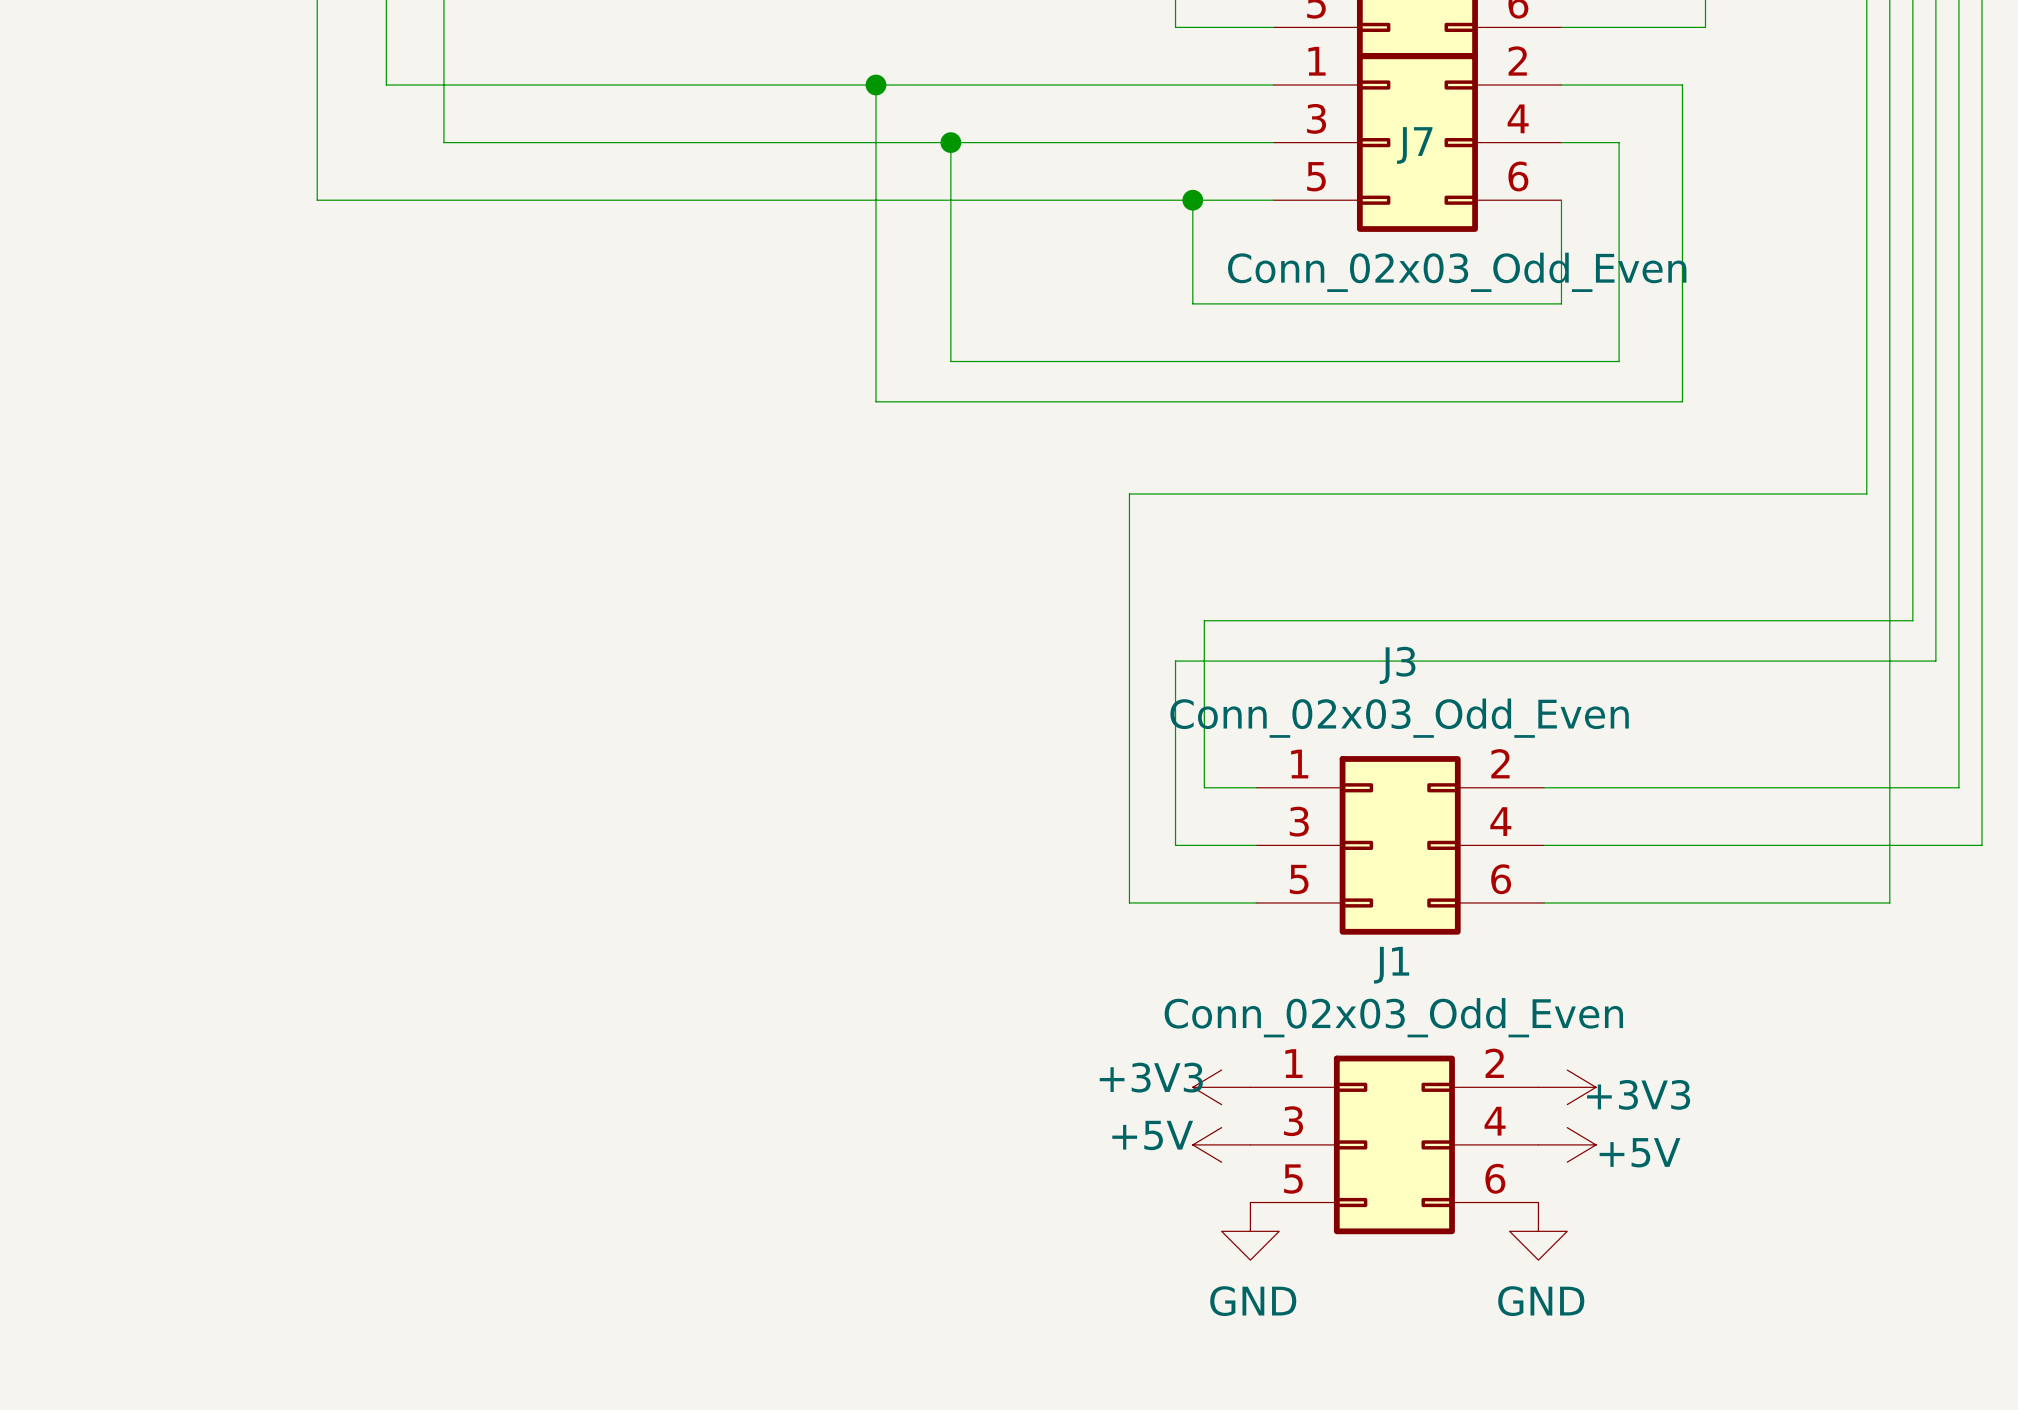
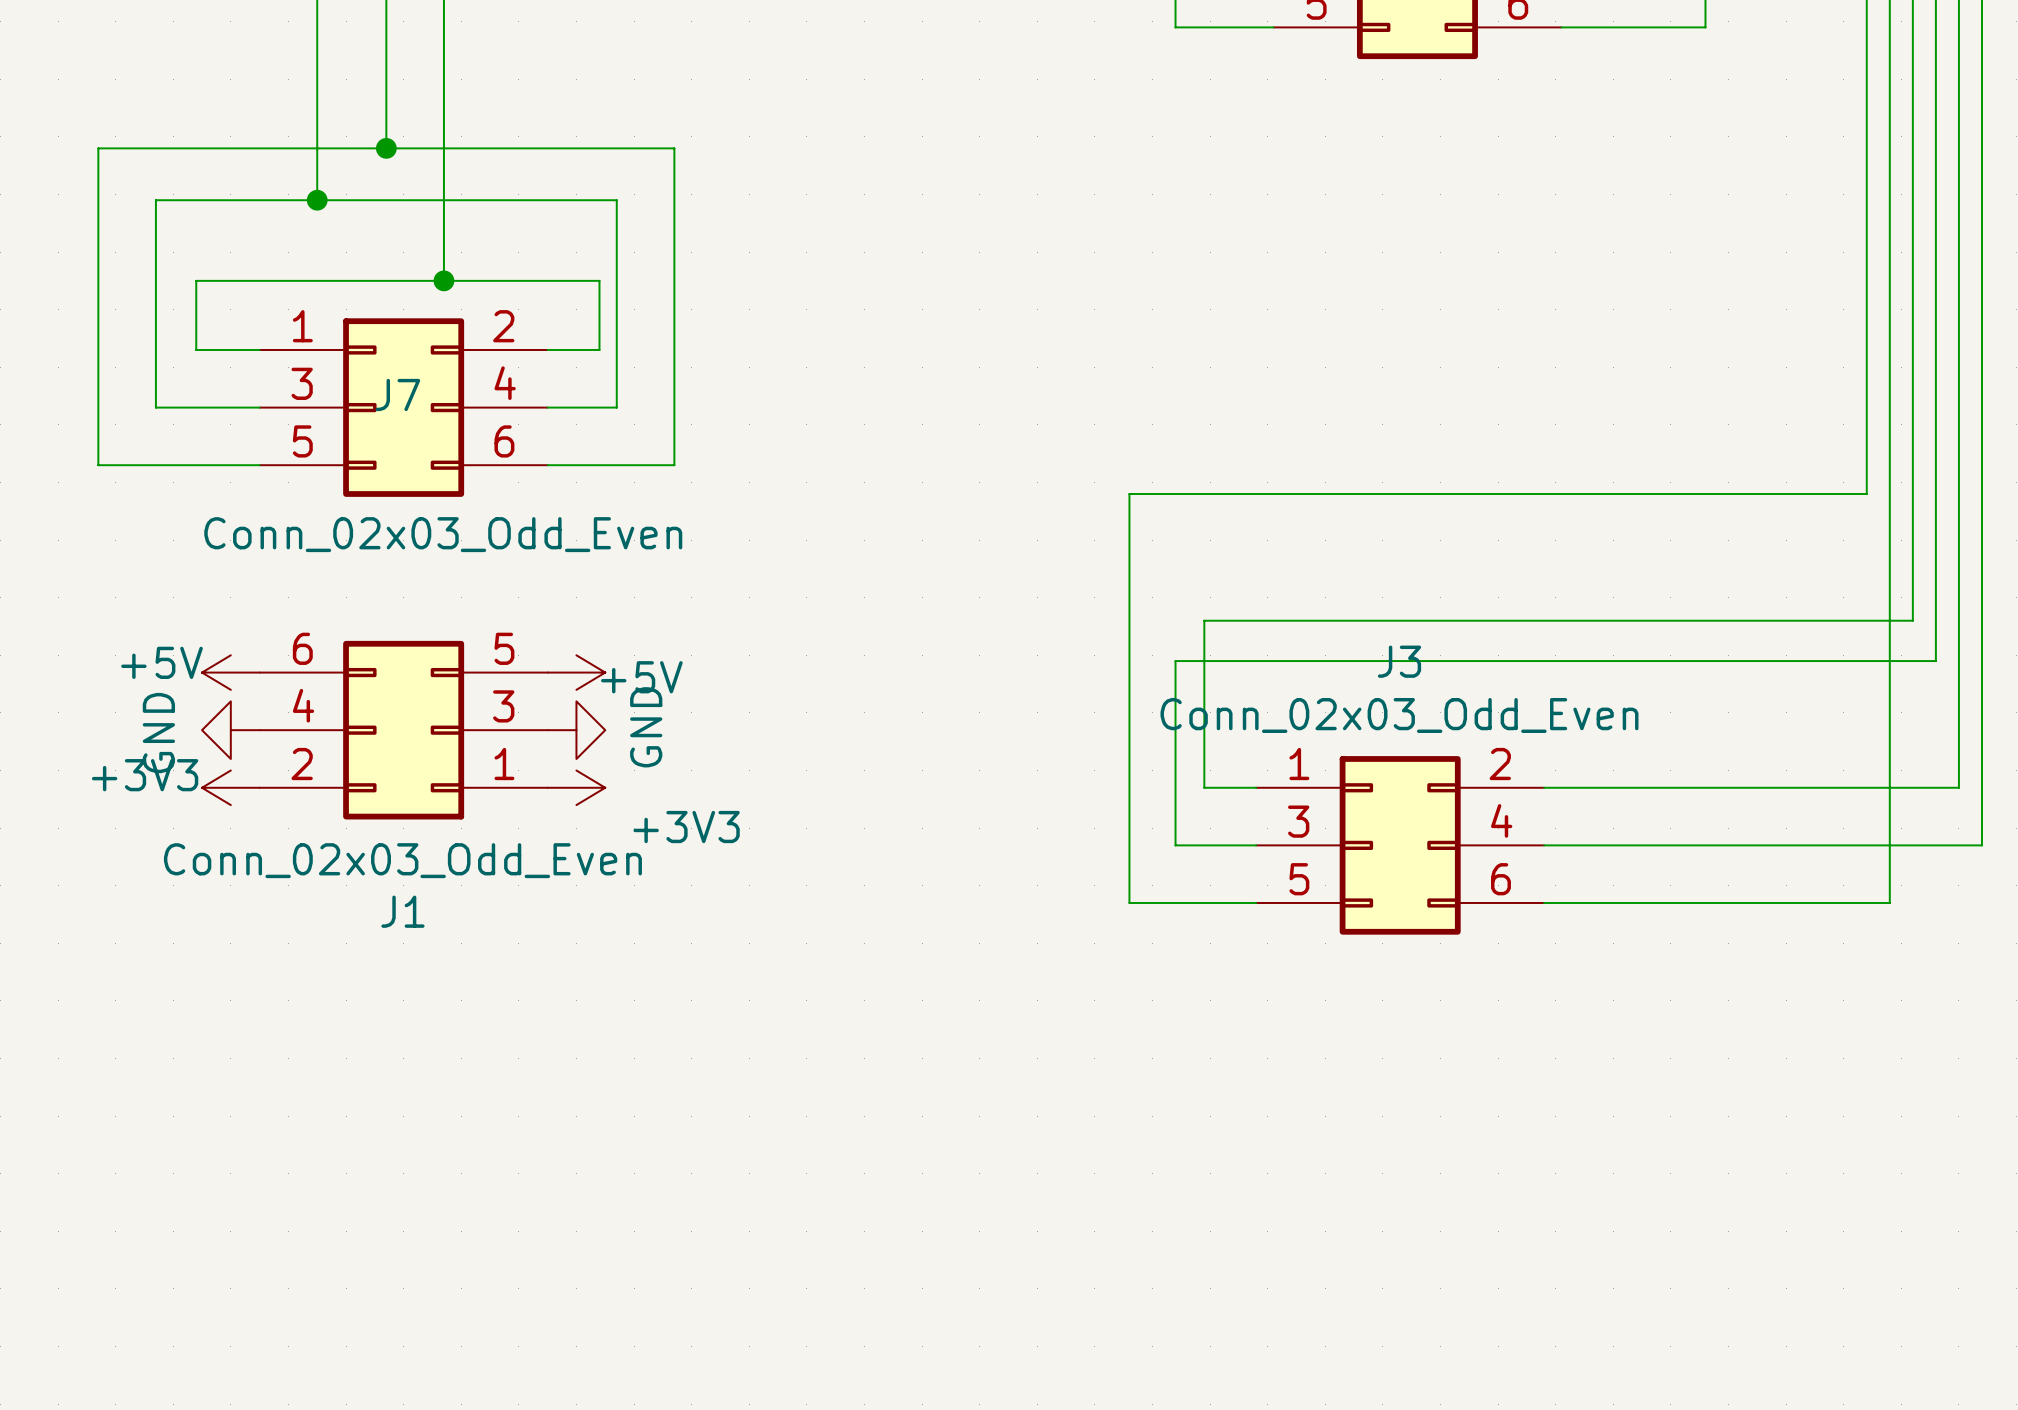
wire: (386, 85) (1273, 85) -> (386, 85) (386, 148)
wire: (875, 85) (875, 401) (1682, 401) (1682, 85) (1561, 85) -> none
junction: (875, 85) -> none
wire: (443, 142) (1273, 142) -> (443, 142) (443, 280)
wire: (950, 142) (950, 361) (1619, 361) (1619, 142) (1561, 142) -> none
junction: (950, 142) -> none
J7 position: (1417, 142) -> (403, 407)
J7 name position: J7 (1414, 145) -> J7 (397, 394)
junction: none -> (386, 148)
wire: none -> (317, 200) (155, 200) (155, 407) (259, 407)
junction: none -> (317, 200)
wire: (616, 200) (1273, 200) -> (616, 200) (616, 407) (547, 407)
wire: (1192, 200) (1192, 303) (1561, 303) (1561, 200) -> none
junction: (1192, 200) -> none
junction: none -> (443, 280)
wire: none -> (259, 349) (196, 349) (196, 280) (599, 280) (599, 349) (547, 349)
wire: none -> (259, 465) (98, 465) (98, 148) (674, 148) (674, 465) (547, 465)
power symbol: none -> +5V (230, 672)
power symbol: none -> +5V (576, 672)
power symbol: none -> GND (230, 730)
power symbol: none -> GND (576, 730)
power symbol: none -> +3V3 (230, 787)
power symbol: none -> +3V3 (576, 787)
power symbol: +3V3 (1221, 1087) -> none
power symbol: +3V3 (1567, 1087) -> none
power symbol: +5V (1221, 1144) -> none
J1 rotation: 0° (1394, 1144) -> 180° (403, 730)
J1 position: (1394, 1144) -> (403, 730)
power symbol: +5V (1567, 1144) -> none
power symbol: GND (1250, 1231) -> none
power symbol: GND (1538, 1231) -> none

